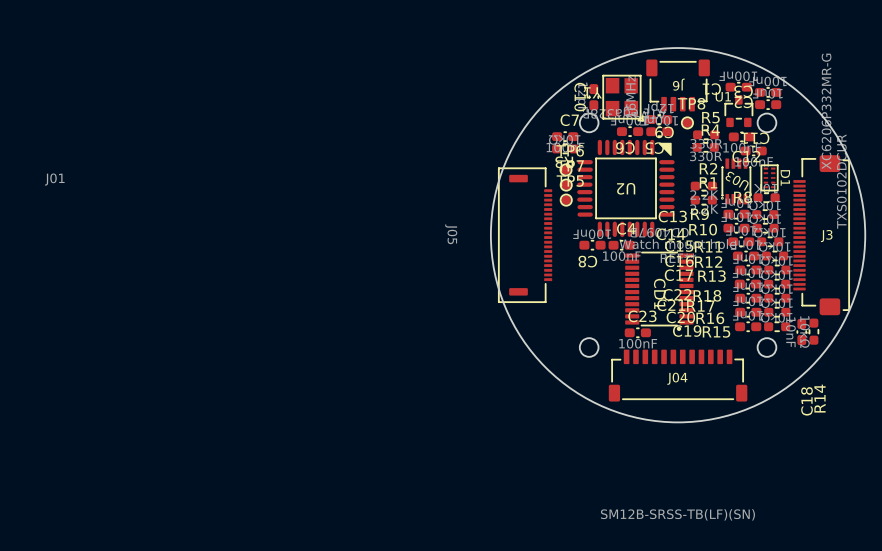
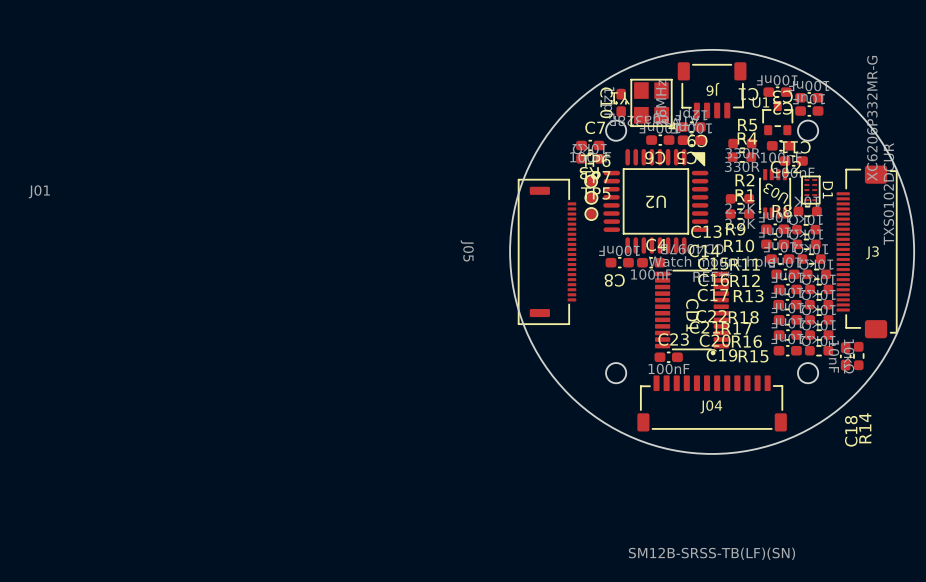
TP8: (687, 122) -> none

